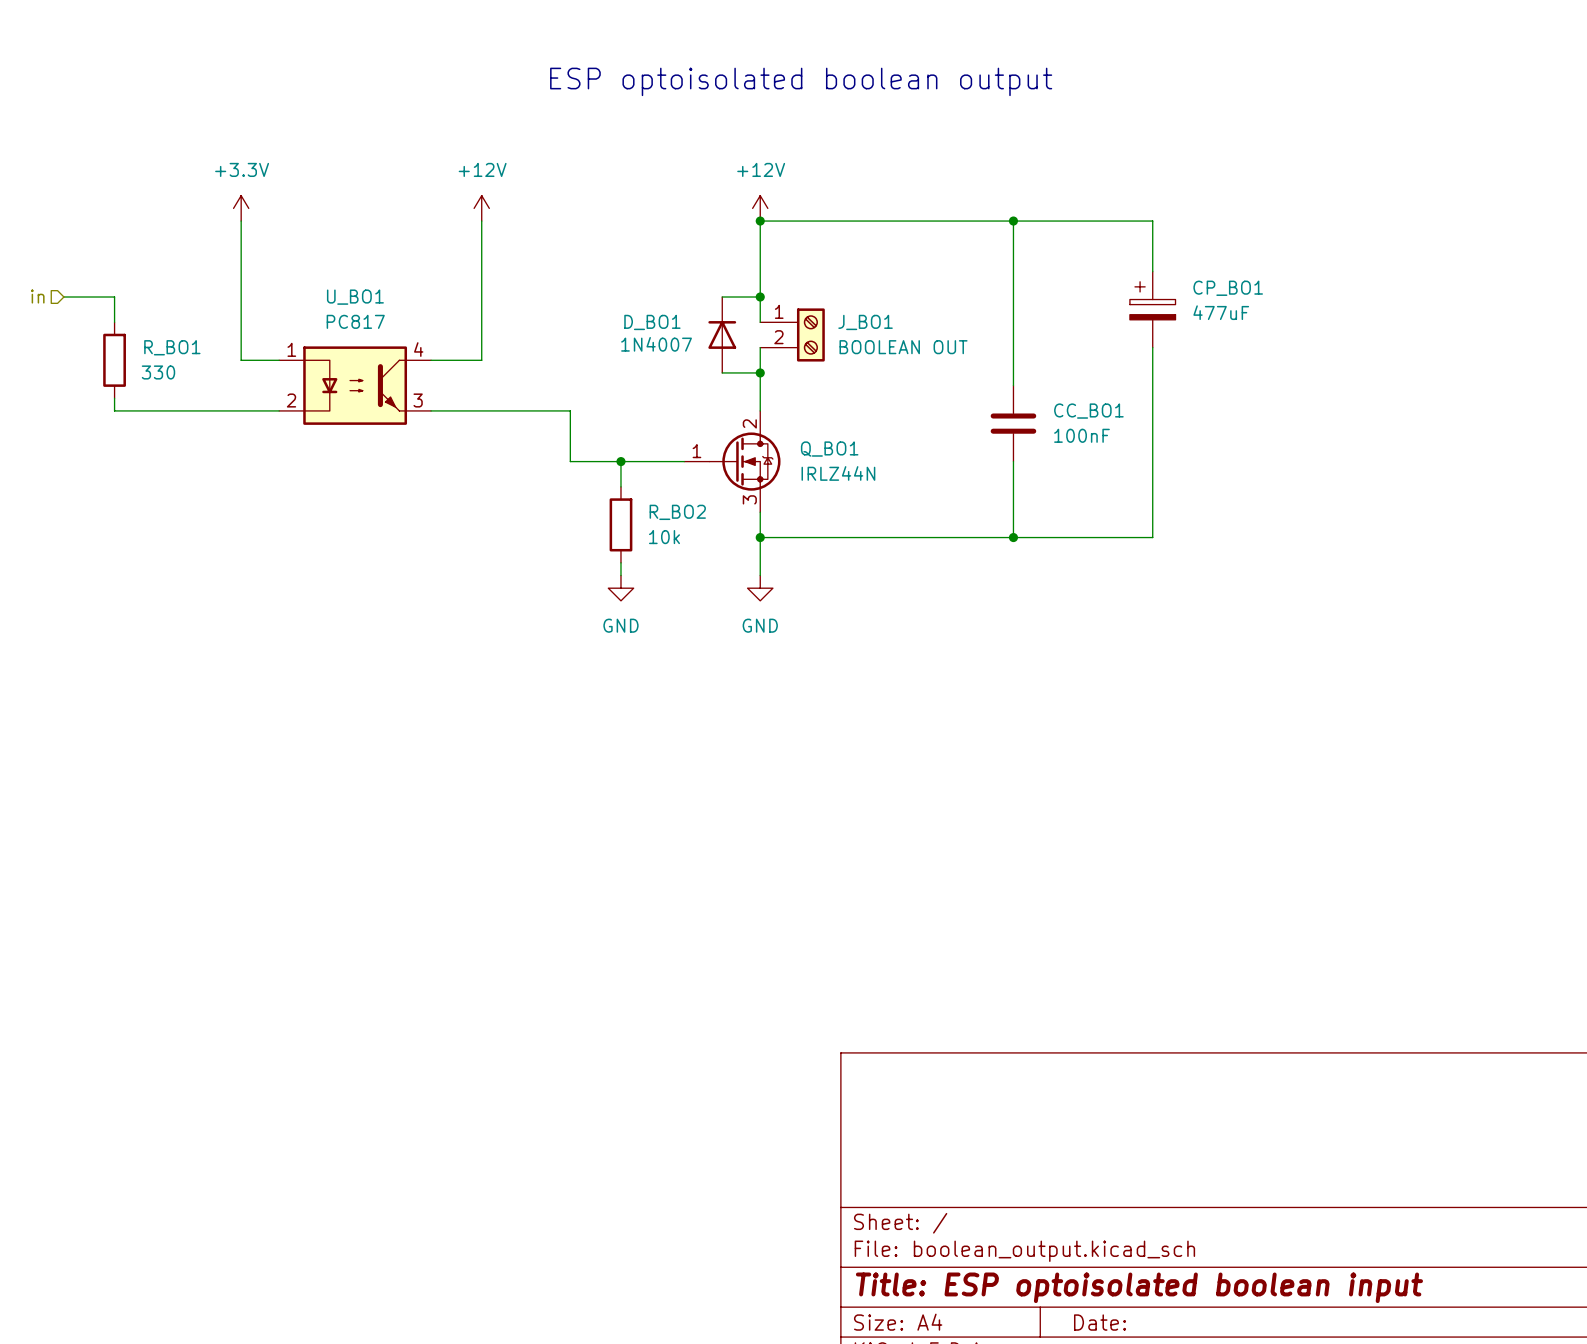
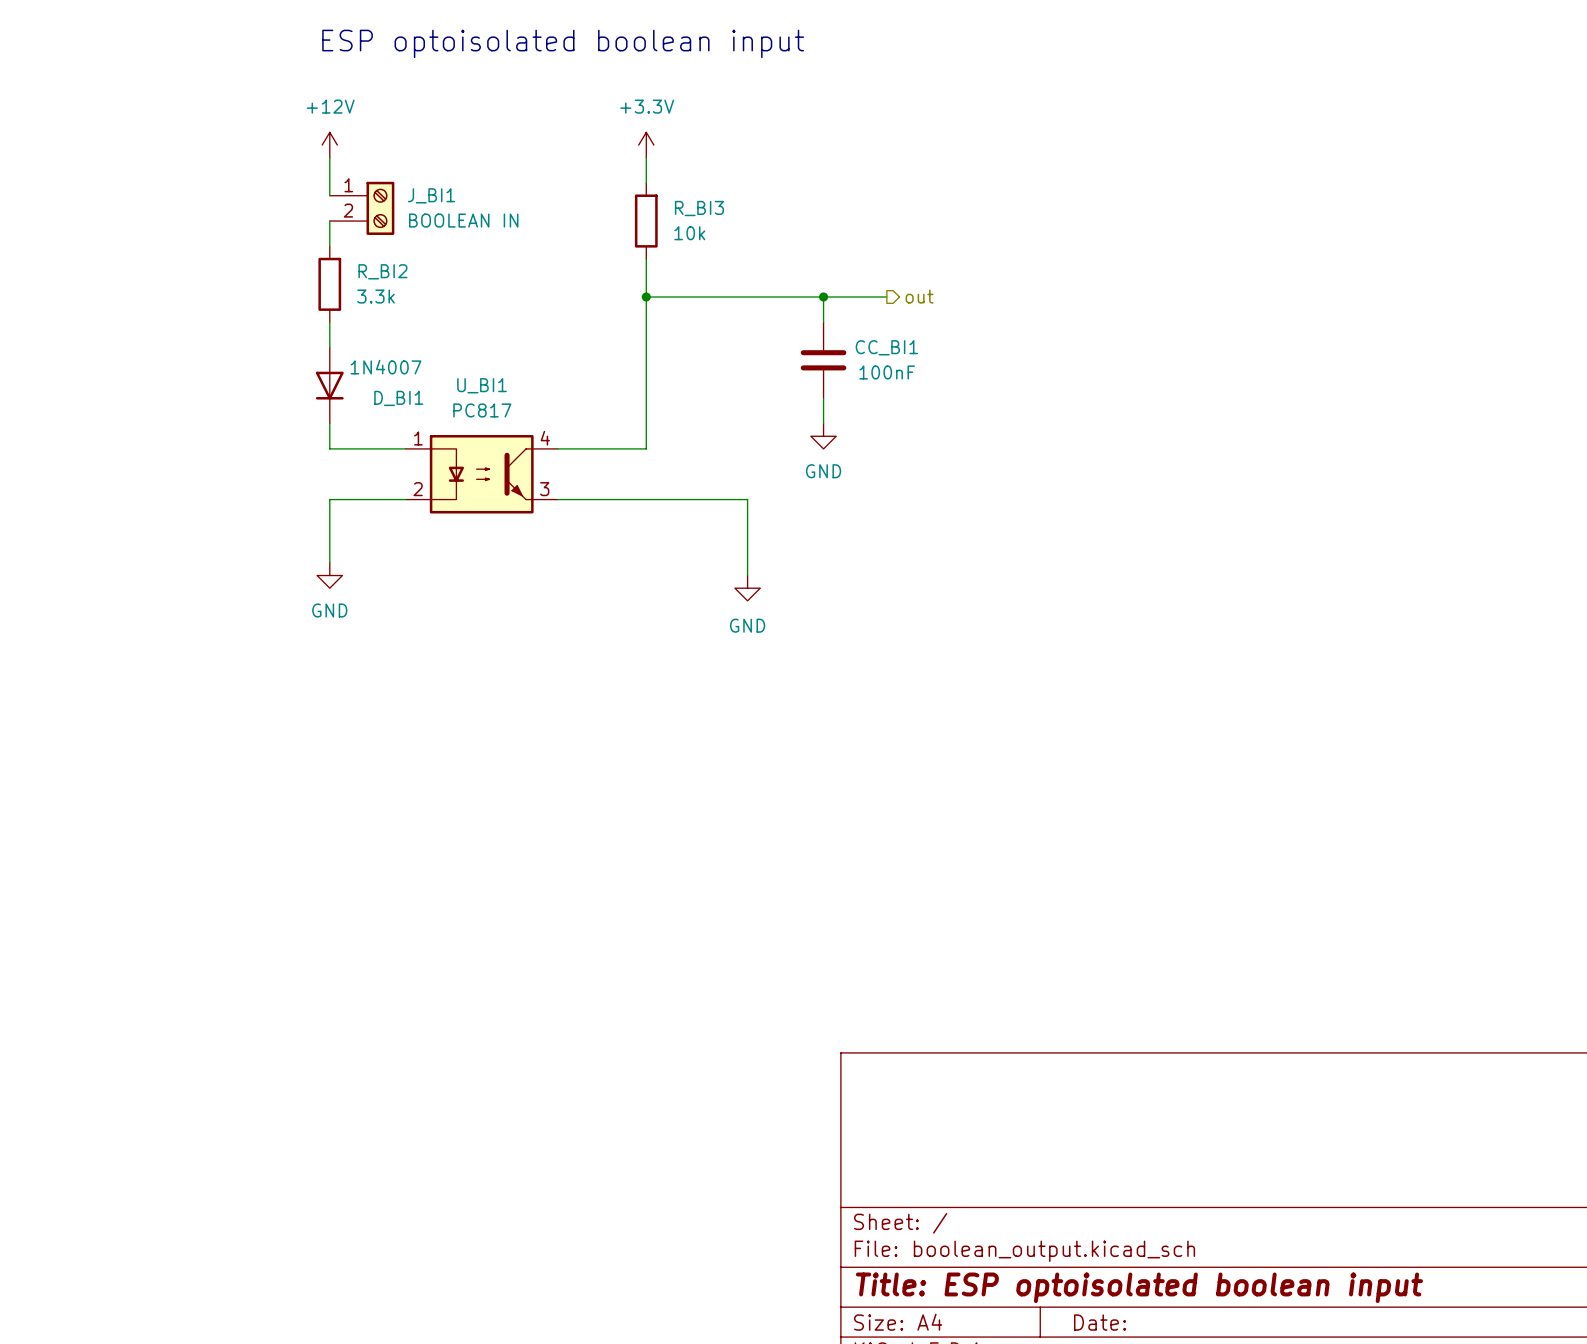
text: ESP optoisolated boolean output (801, 81) -> ESP optoisolated boolean input (563, 43)
power symbol: none -> +3.3V (646, 145)
wire: none -> (329, 157) (329, 195)
wire: none -> (646, 157) (646, 183)
power symbol: +3.3V (241, 208) -> none
J_BI1: none -> BOOLEAN IN (362, 208)
power symbol position: +12V (481, 208) -> +12V (329, 145)
power symbol: +12V (760, 208) -> none
wire: (241, 221) (241, 360) (279, 360) -> none
wire: none -> (329, 221) (329, 246)
wire: (481, 221) (481, 360) (431, 360) -> none
R_BI3: none -> 10k (646, 221)
junction: (760, 221) -> none
wire: (1013, 221) (1013, 385) -> none
junction: (1013, 221) -> none
wire: none -> (646, 259) (646, 448) (557, 448)
wire: (1152, 271) (1152, 221) (760, 221) (760, 322) -> none
R_BI2: none -> 3.3k (329, 284)
hierarchical label: in (37, 296) -> none
hierarchical label: none -> out (919, 296)
wire: (63, 297) (114, 297) (114, 322) -> none
wire: none -> (646, 297) (722, 297)
junction: none -> (646, 297)
wire: none -> (760, 297) (886, 297)
junction: (760, 297) -> none
junction: none -> (823, 297)
CP_BO1: 477uF (1152, 309) -> none
wire: none -> (329, 322) (329, 347)
D_BO1: 1N4007 (722, 334) -> none
J_BO1: BOOLEAN OUT (792, 334) -> none
wire: (760, 347) (760, 410) -> none
wire: (1152, 347) (1152, 537) (760, 537) -> none
R_BO1: 330 (114, 360) -> none
CC_BI1: none -> 100nF (823, 360)
wire: (722, 372) (760, 372) -> none
junction: (760, 372) -> none
D_BI1: none -> 1N4007 (329, 385)
U_BO1: PC817 (355, 385) -> none
wire: (114, 398) (114, 410) (279, 410) -> none
wire: (431, 410) (570, 410) (570, 461) (684, 461) -> none
wire: none -> (329, 423) (329, 448) (405, 448)
CC_BO1: 100nF (1013, 423) -> none
power symbol: none -> GND (823, 436)
wire: (620, 461) (620, 486) -> (823, 398) (823, 423)
junction: (620, 461) -> none
Q_BO1: IRLZ44N (732, 461) -> none
wire: (1013, 461) (1013, 537) -> none
U_BI1: none -> PC817 (481, 474)
wire: none -> (405, 499) (329, 499) (329, 562)
wire: none -> (557, 499) (747, 499) (747, 575)
wire: (760, 512) (760, 575) -> none
R_BO2: 10k (620, 524) -> none
junction: (760, 537) -> none
junction: (1013, 537) -> none
wire: (620, 562) (620, 575) -> none
power symbol: none -> GND (329, 575)
power symbol: GND (620, 588) -> none
power symbol position: GND (760, 588) -> GND (747, 588)

